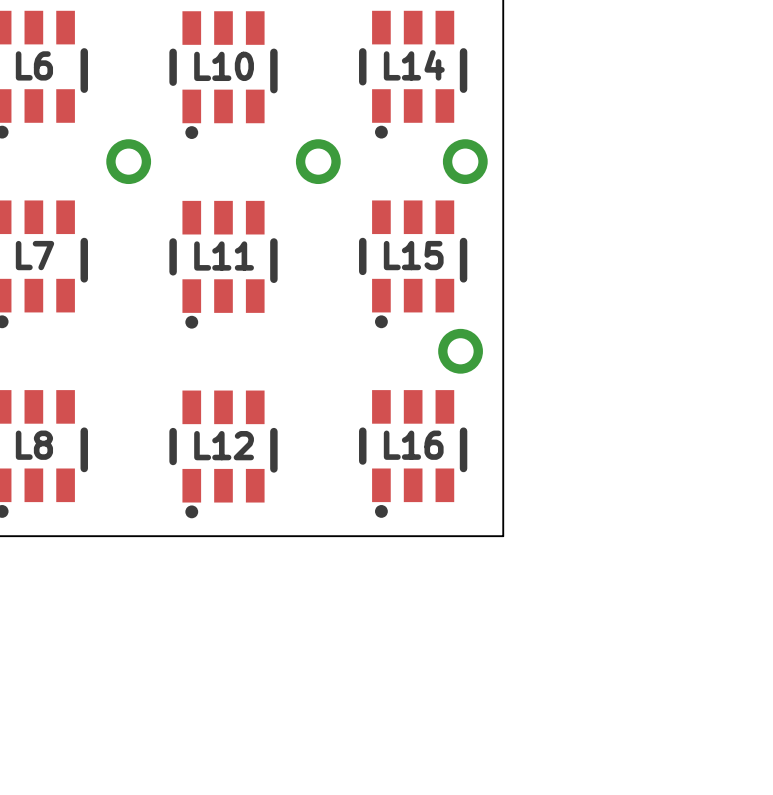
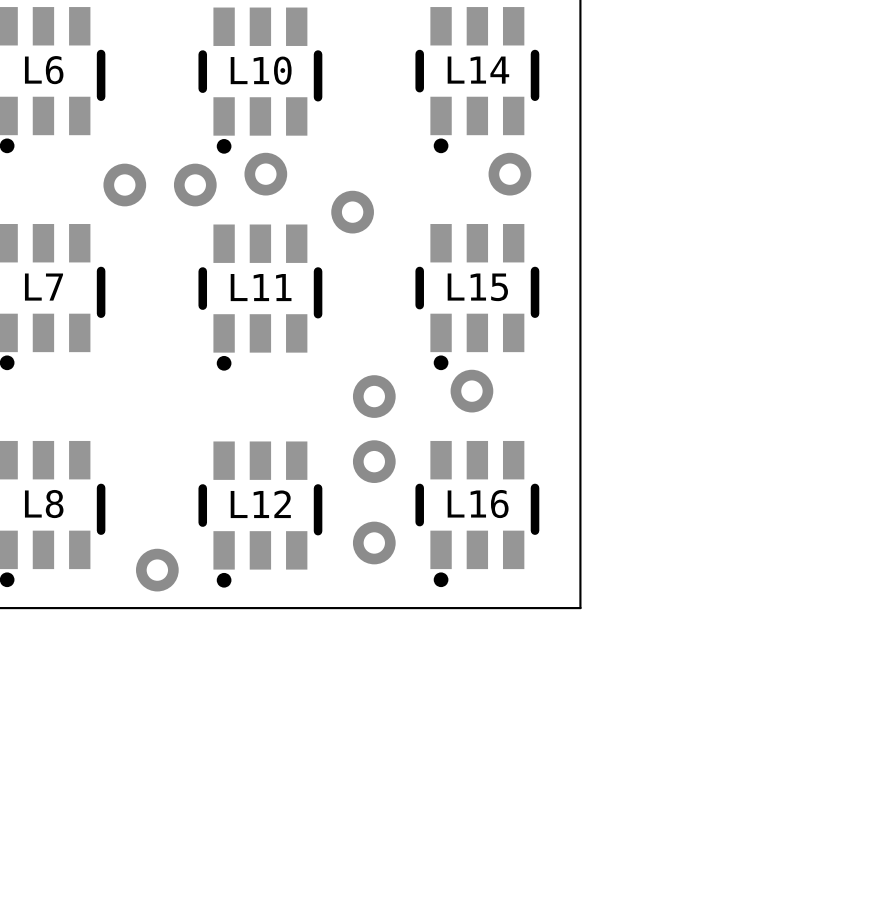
part footprint: [295, 139, 341, 185] -> [331, 190, 374, 234]
part footprint: [442, 139, 488, 185] -> [488, 152, 532, 196]
part: none -> (265, 174)
part: (128, 161) -> none
part: none -> (124, 185)
part: none -> (195, 185)
part: none -> (471, 391)
part: none -> (374, 396)
part: (460, 351) -> none
part: none -> (374, 461)
part: none -> (374, 542)
part: none -> (157, 570)

